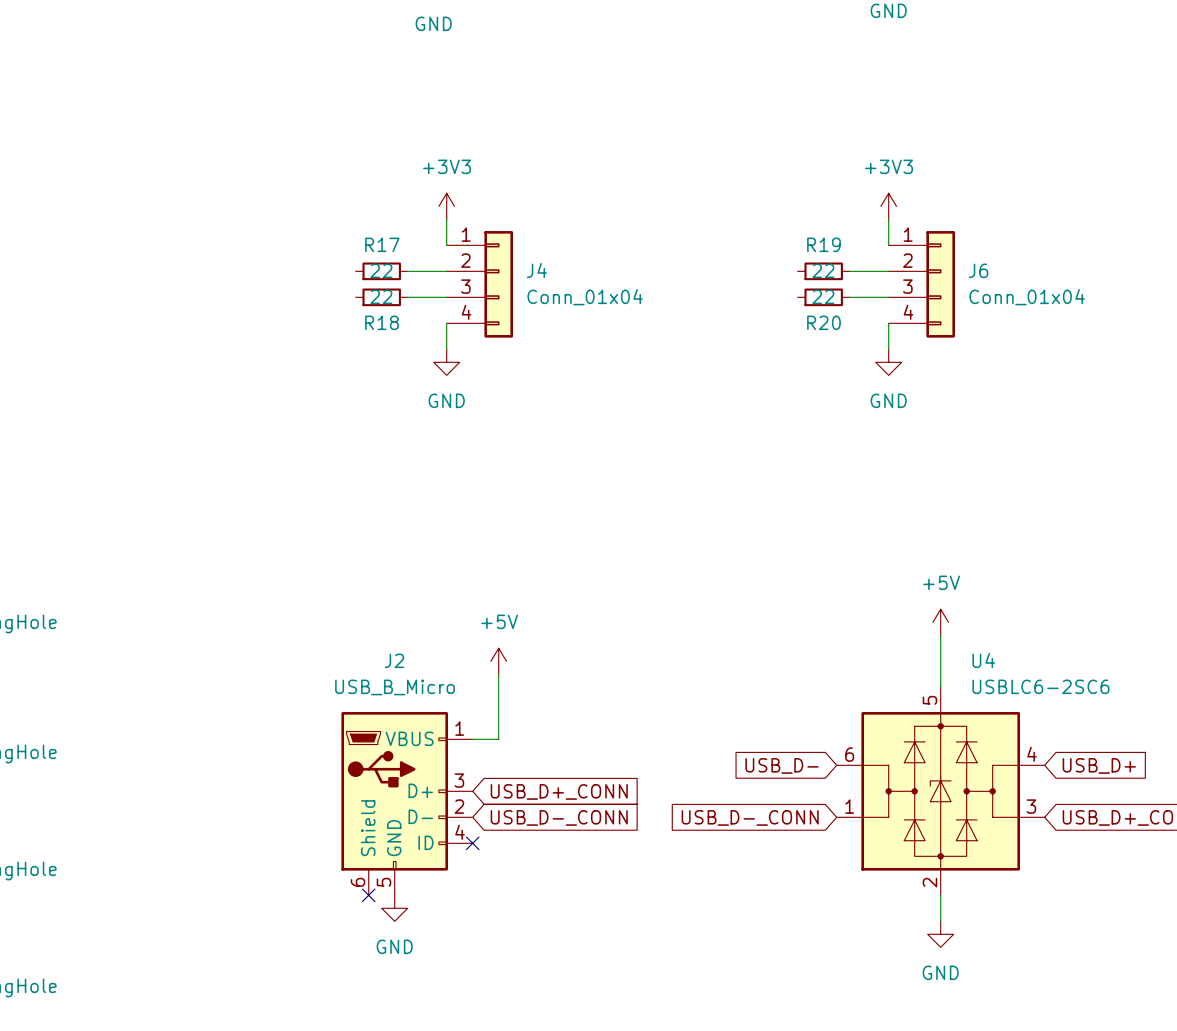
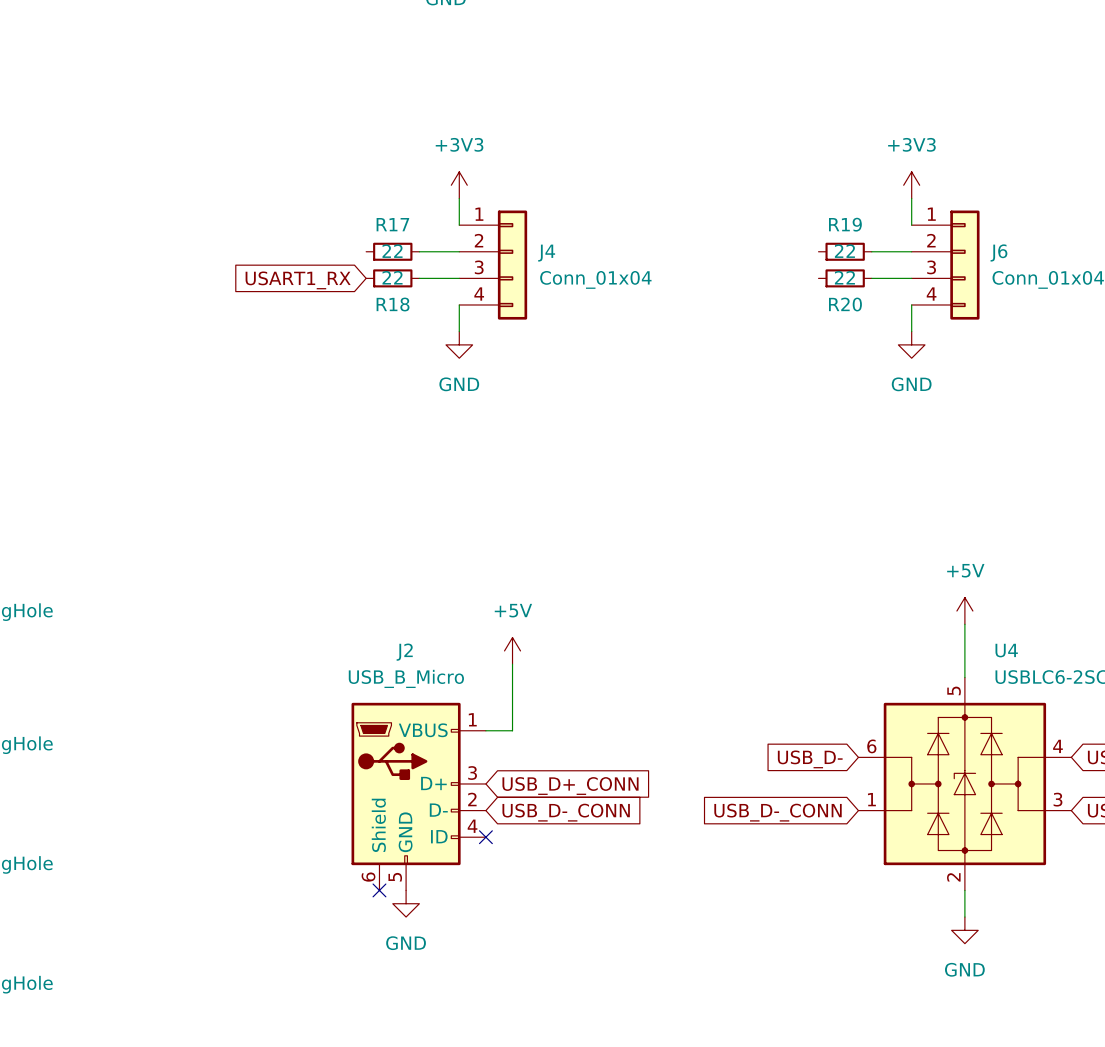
global label: none -> USART1_RX (298, 280)

